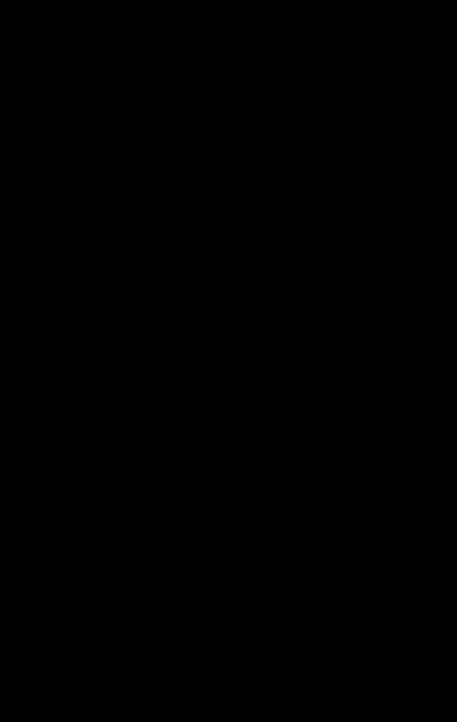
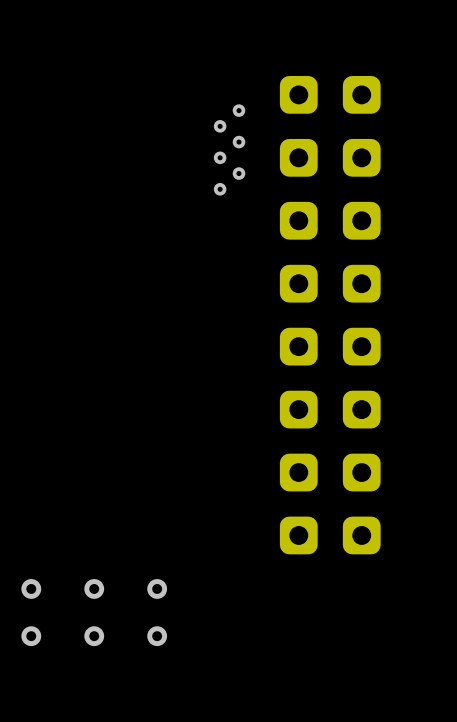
via: none -> (238, 110)
via: none -> (220, 126)
via: none -> (238, 142)
via: none -> (220, 157)
via: none -> (238, 173)
via: none -> (220, 189)
part: none -> (330, 315)
via: none -> (31, 588)
via: none -> (94, 588)
via: none -> (157, 588)
via: none -> (31, 636)
via: none -> (94, 636)
via: none -> (157, 636)

